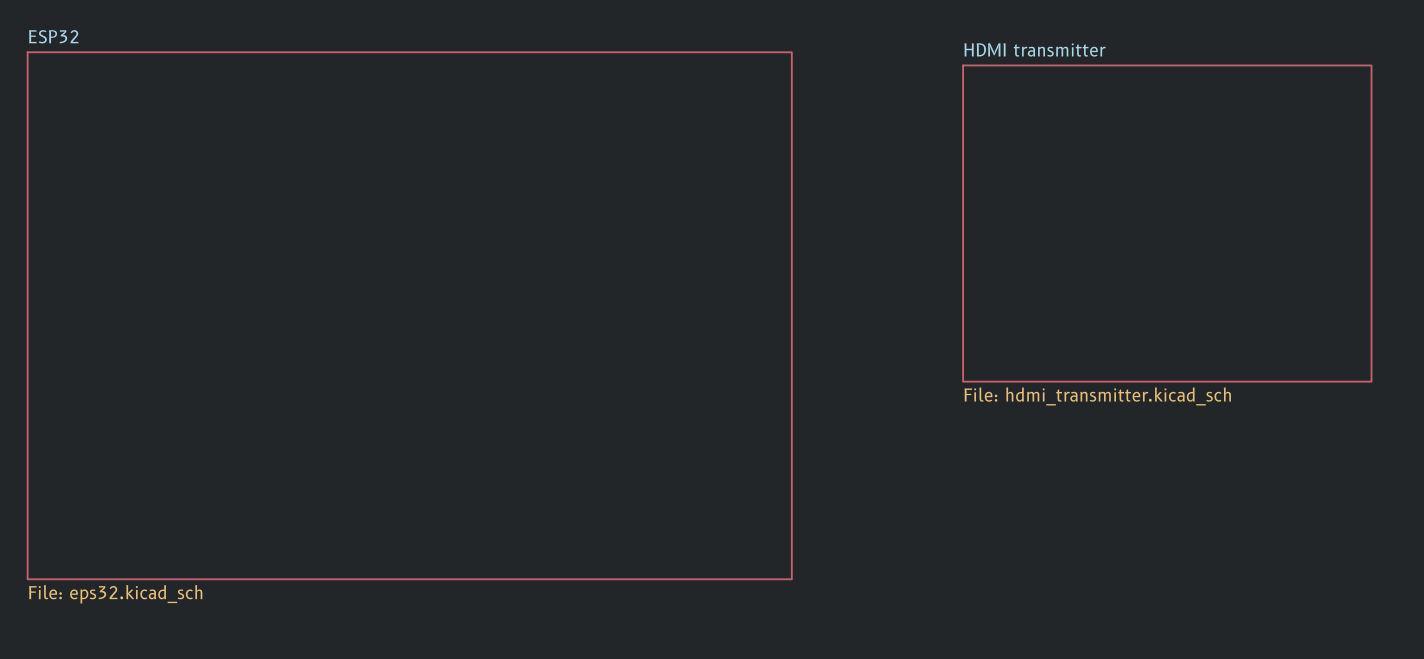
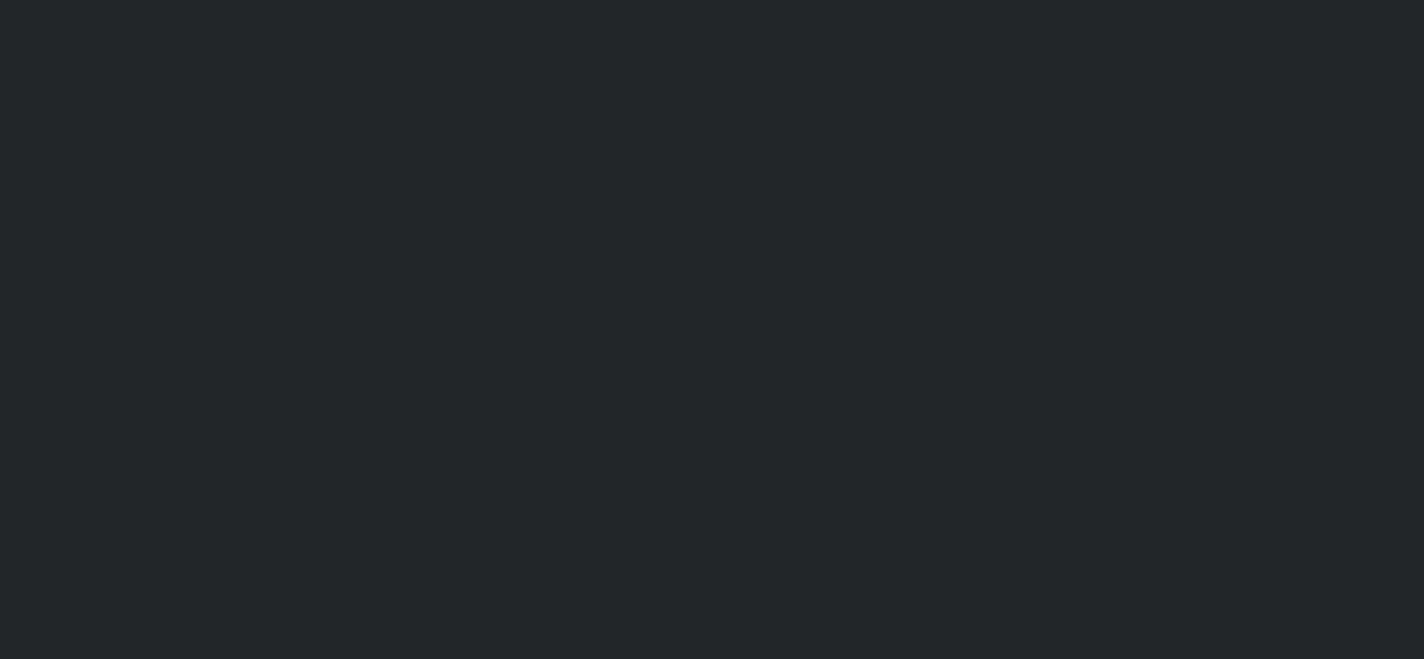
sheet HDMI transmitter: File: hdmi_transmitter.kicad_sch (1167, 223) -> none
sheet ESP32: File: eps32.kicad_sch (409, 315) -> none

